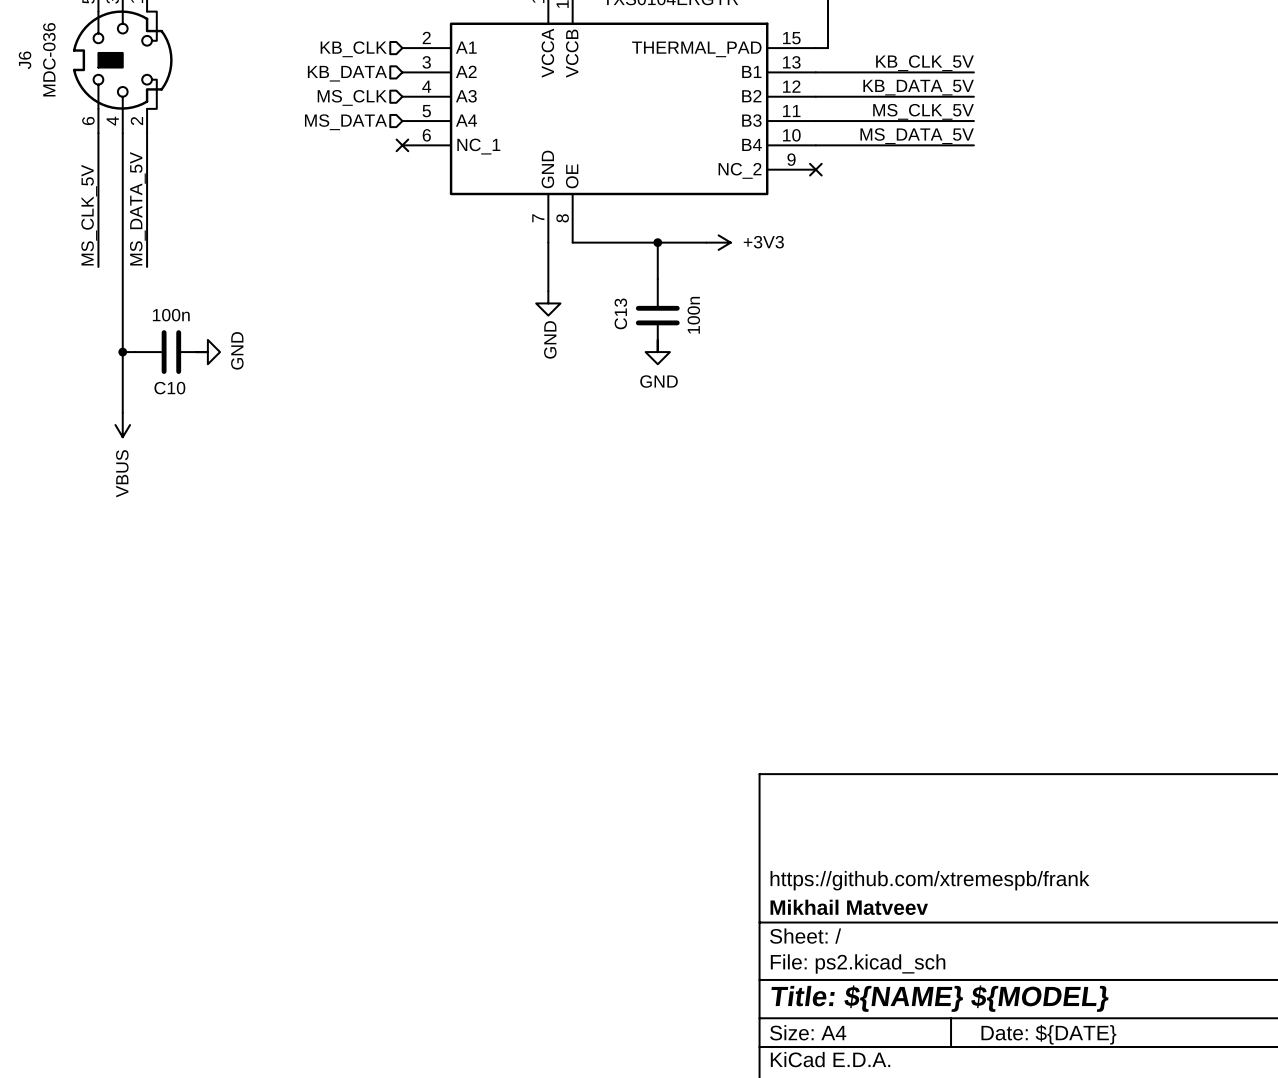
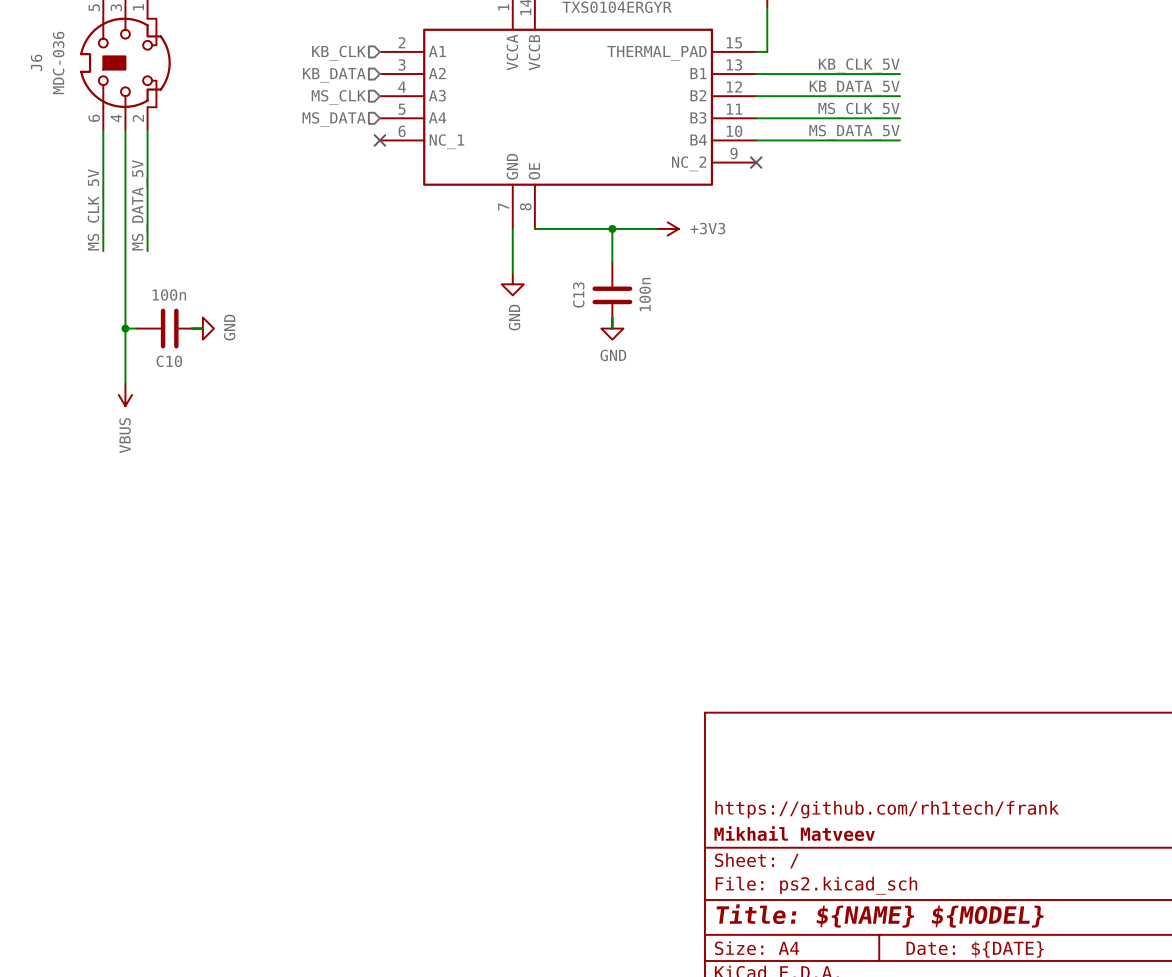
title block: https://github.com/xtremespb/frank (929, 880) -> https://github.com/rh1tech/frank (887, 809)

